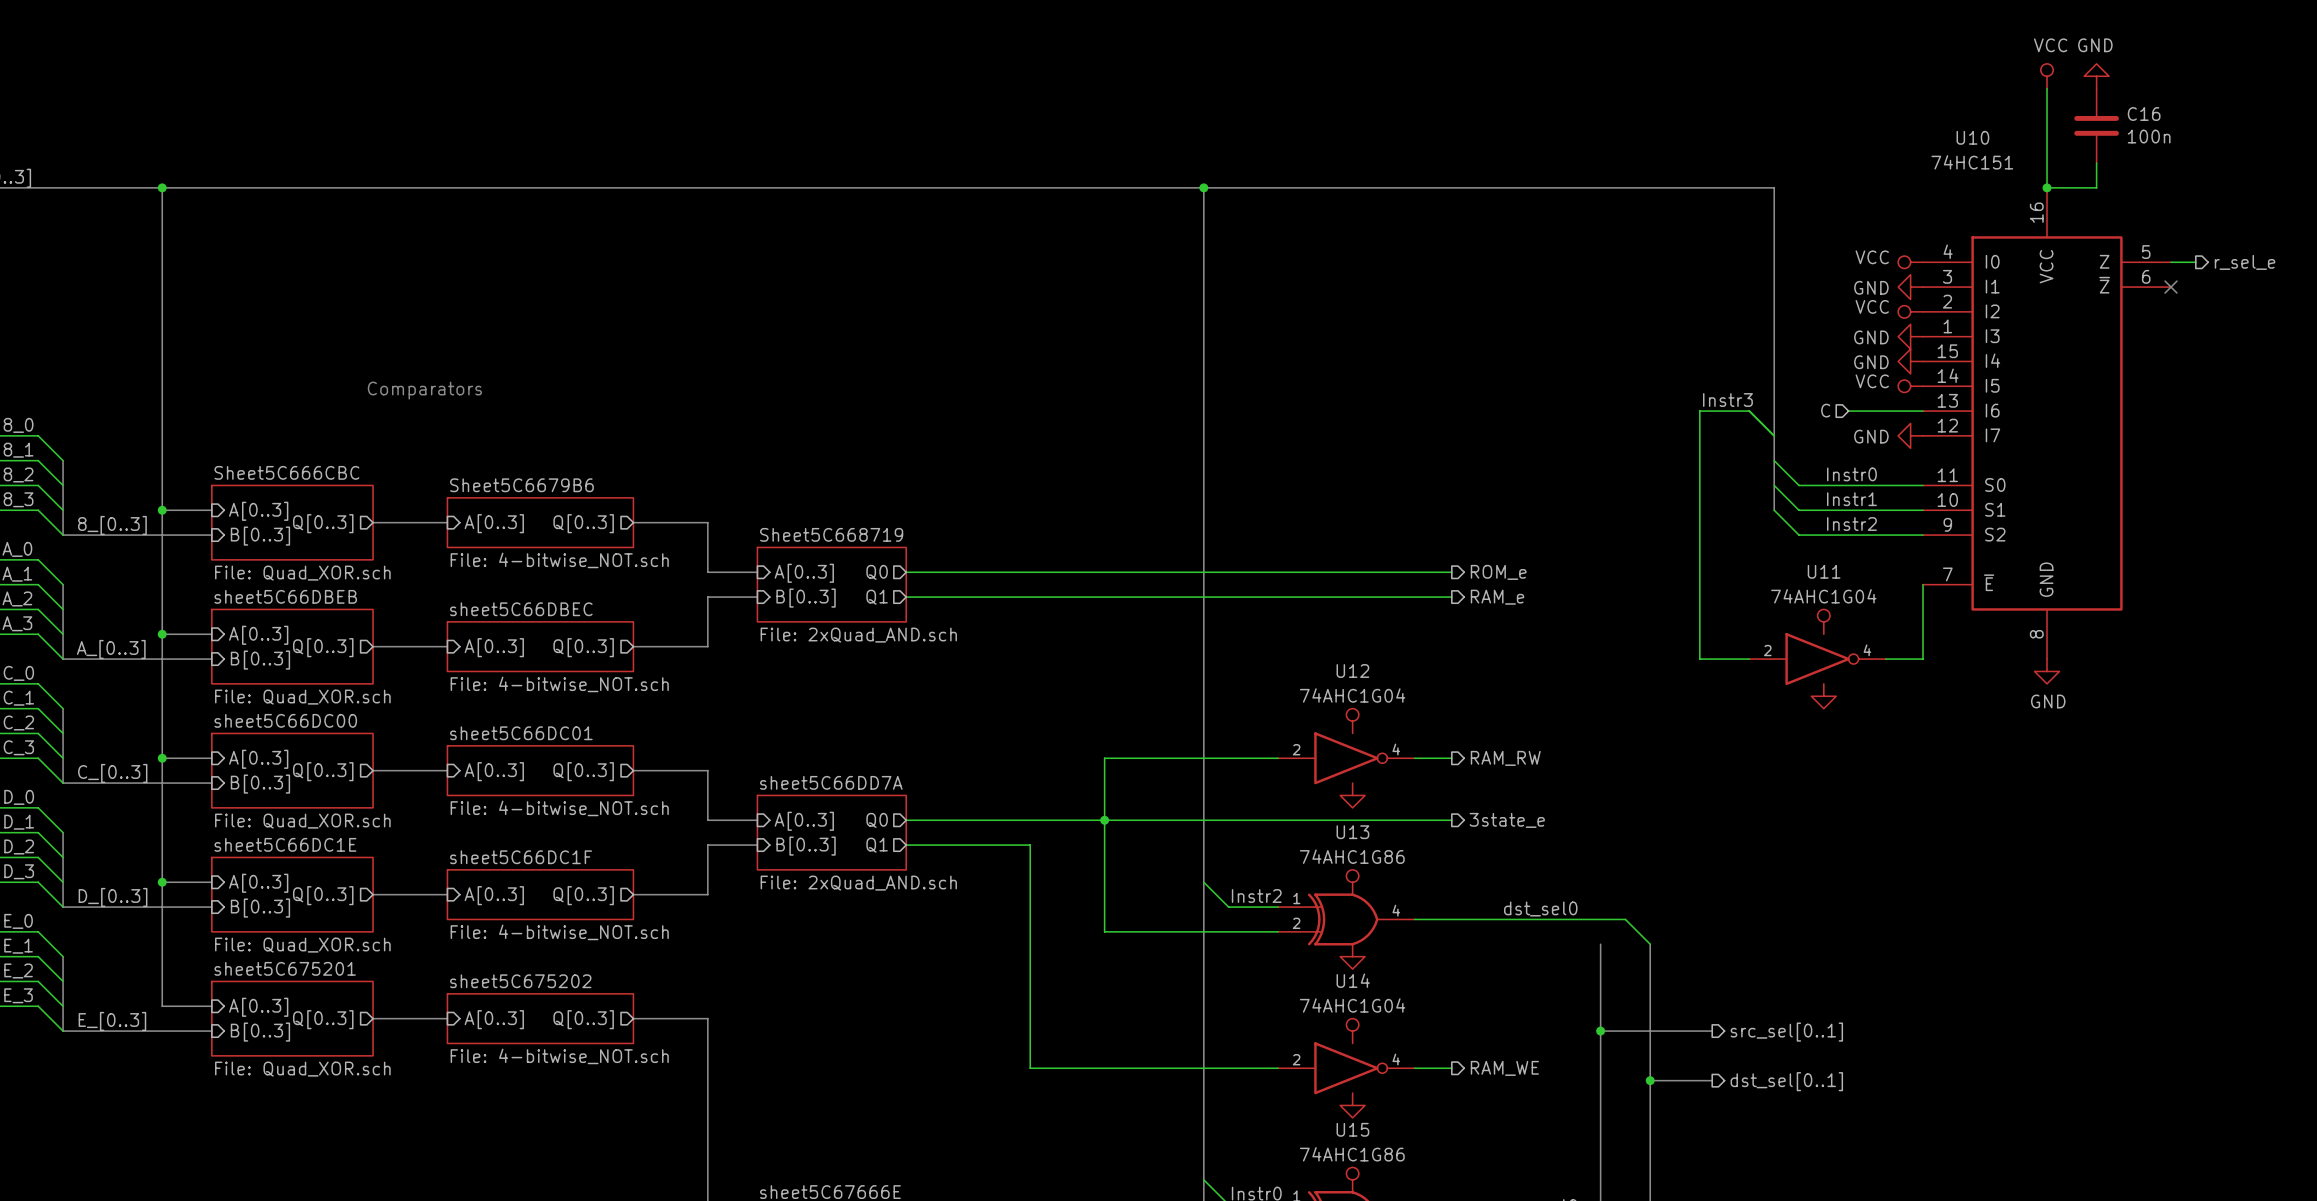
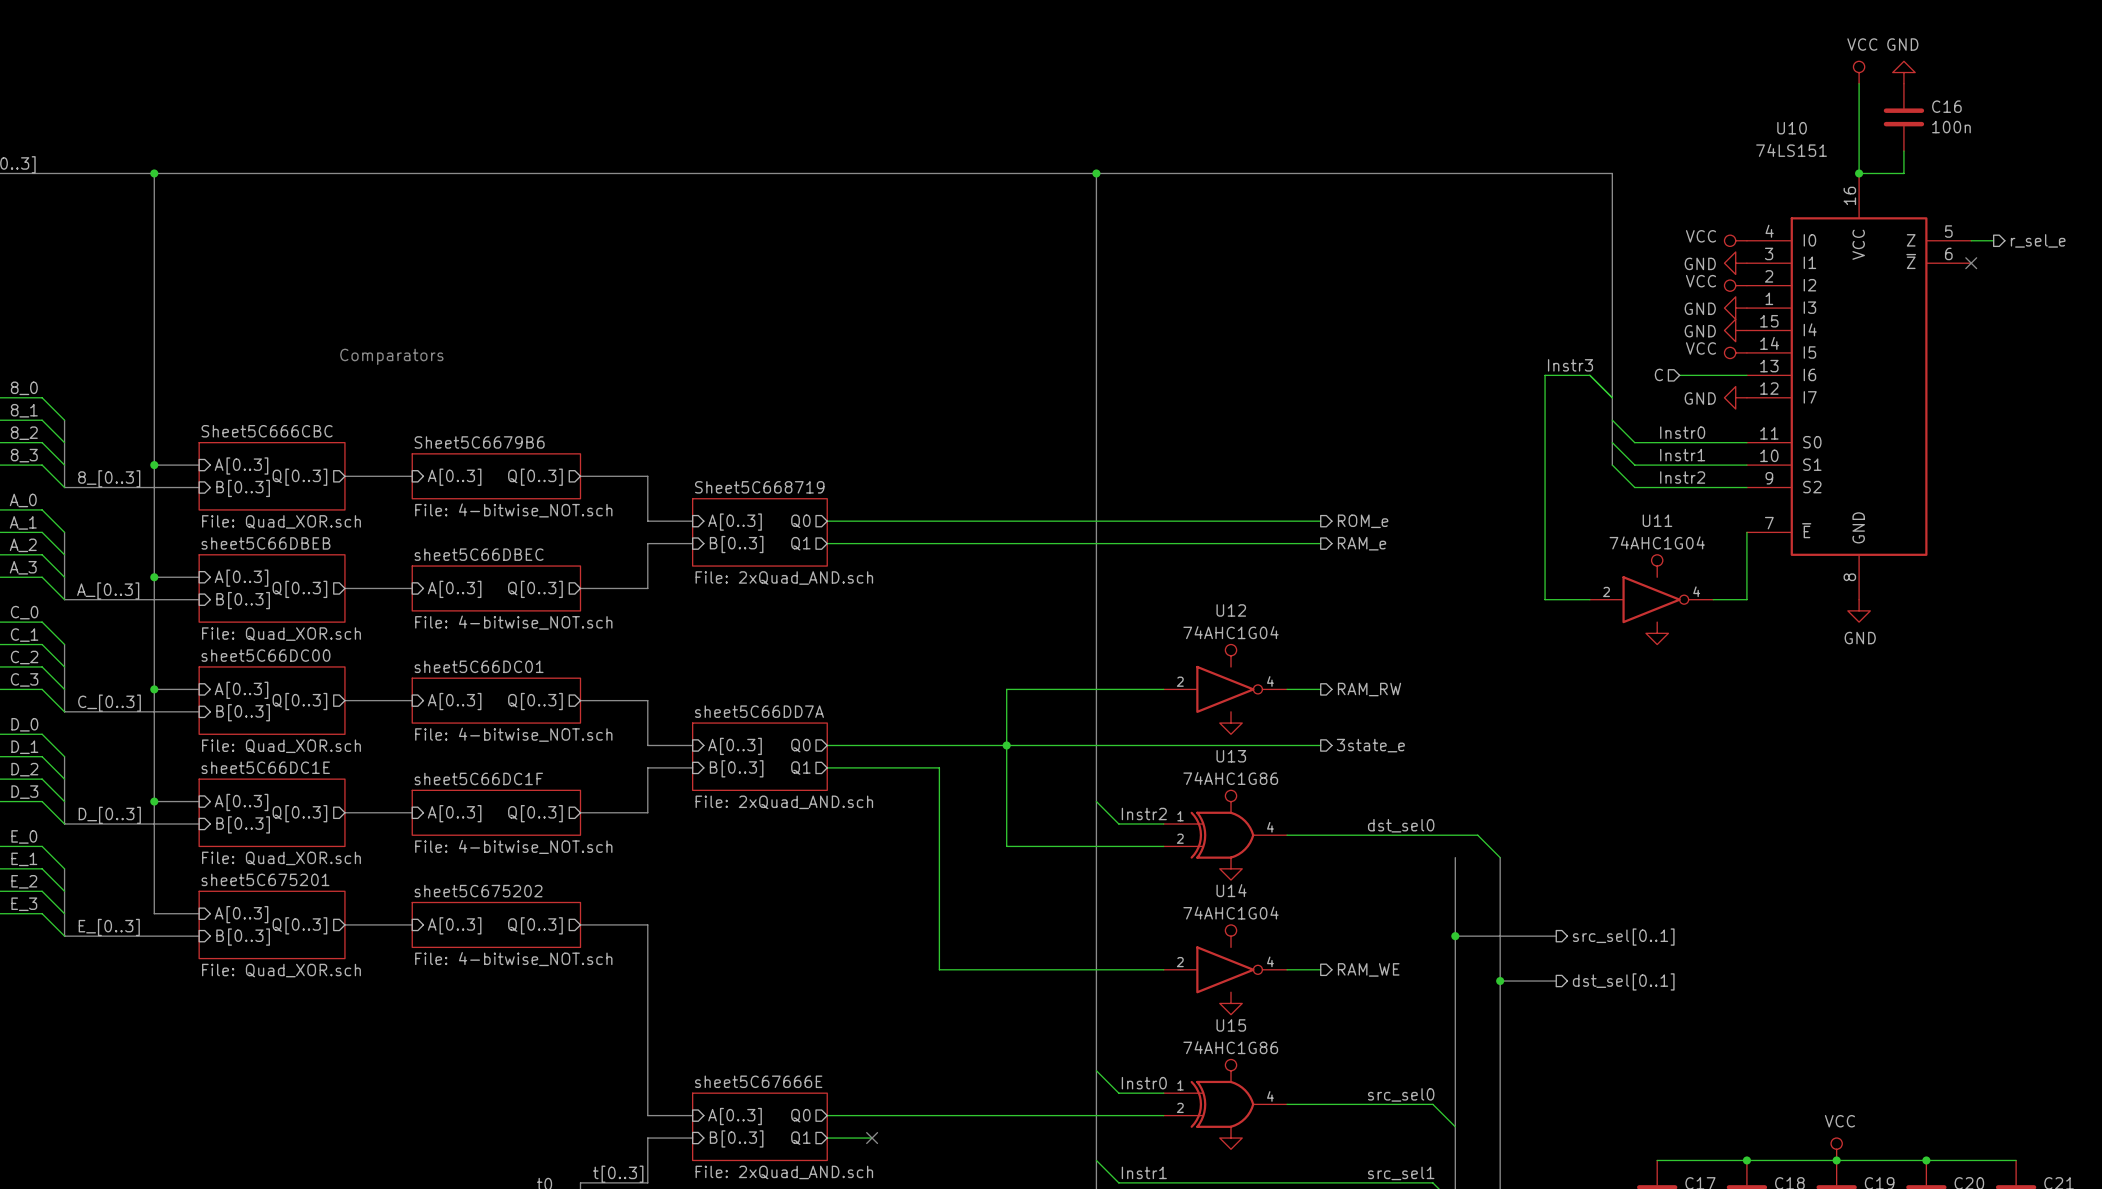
U10 value: 74HC151 (1972, 162) -> 74LS151 (1791, 150)

